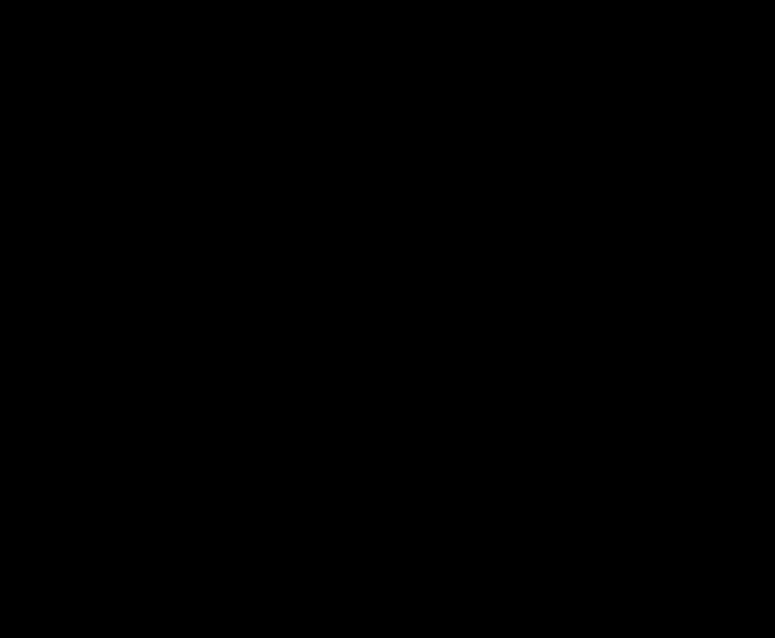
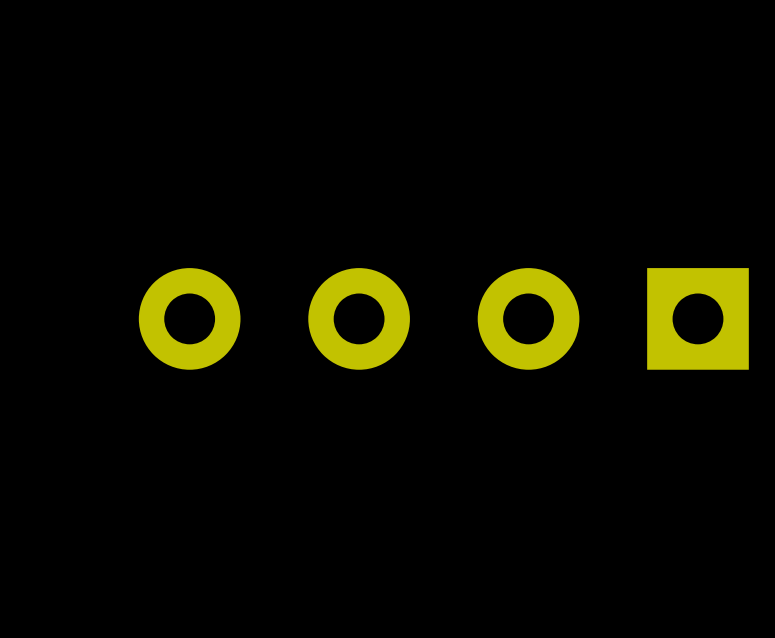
part: none -> (443, 318)

